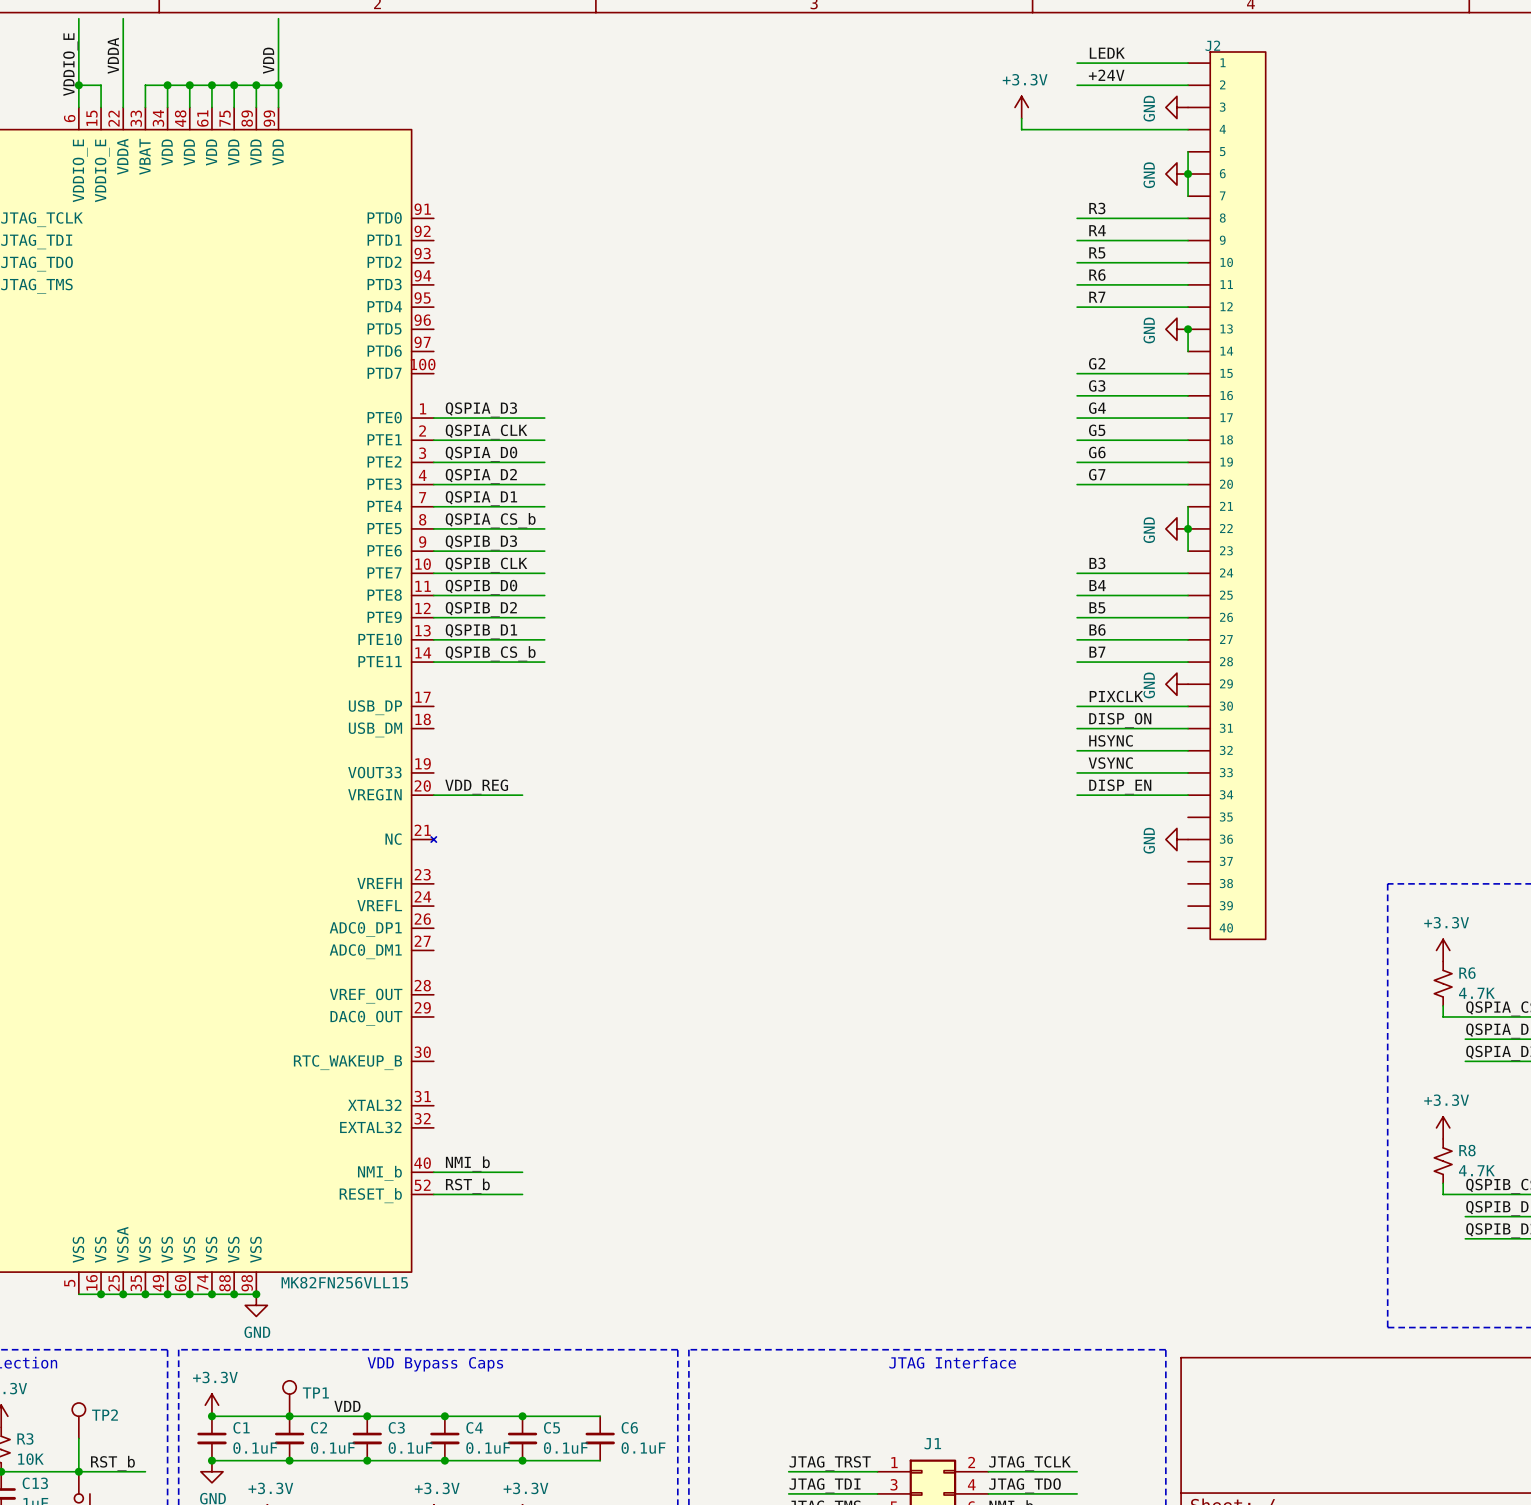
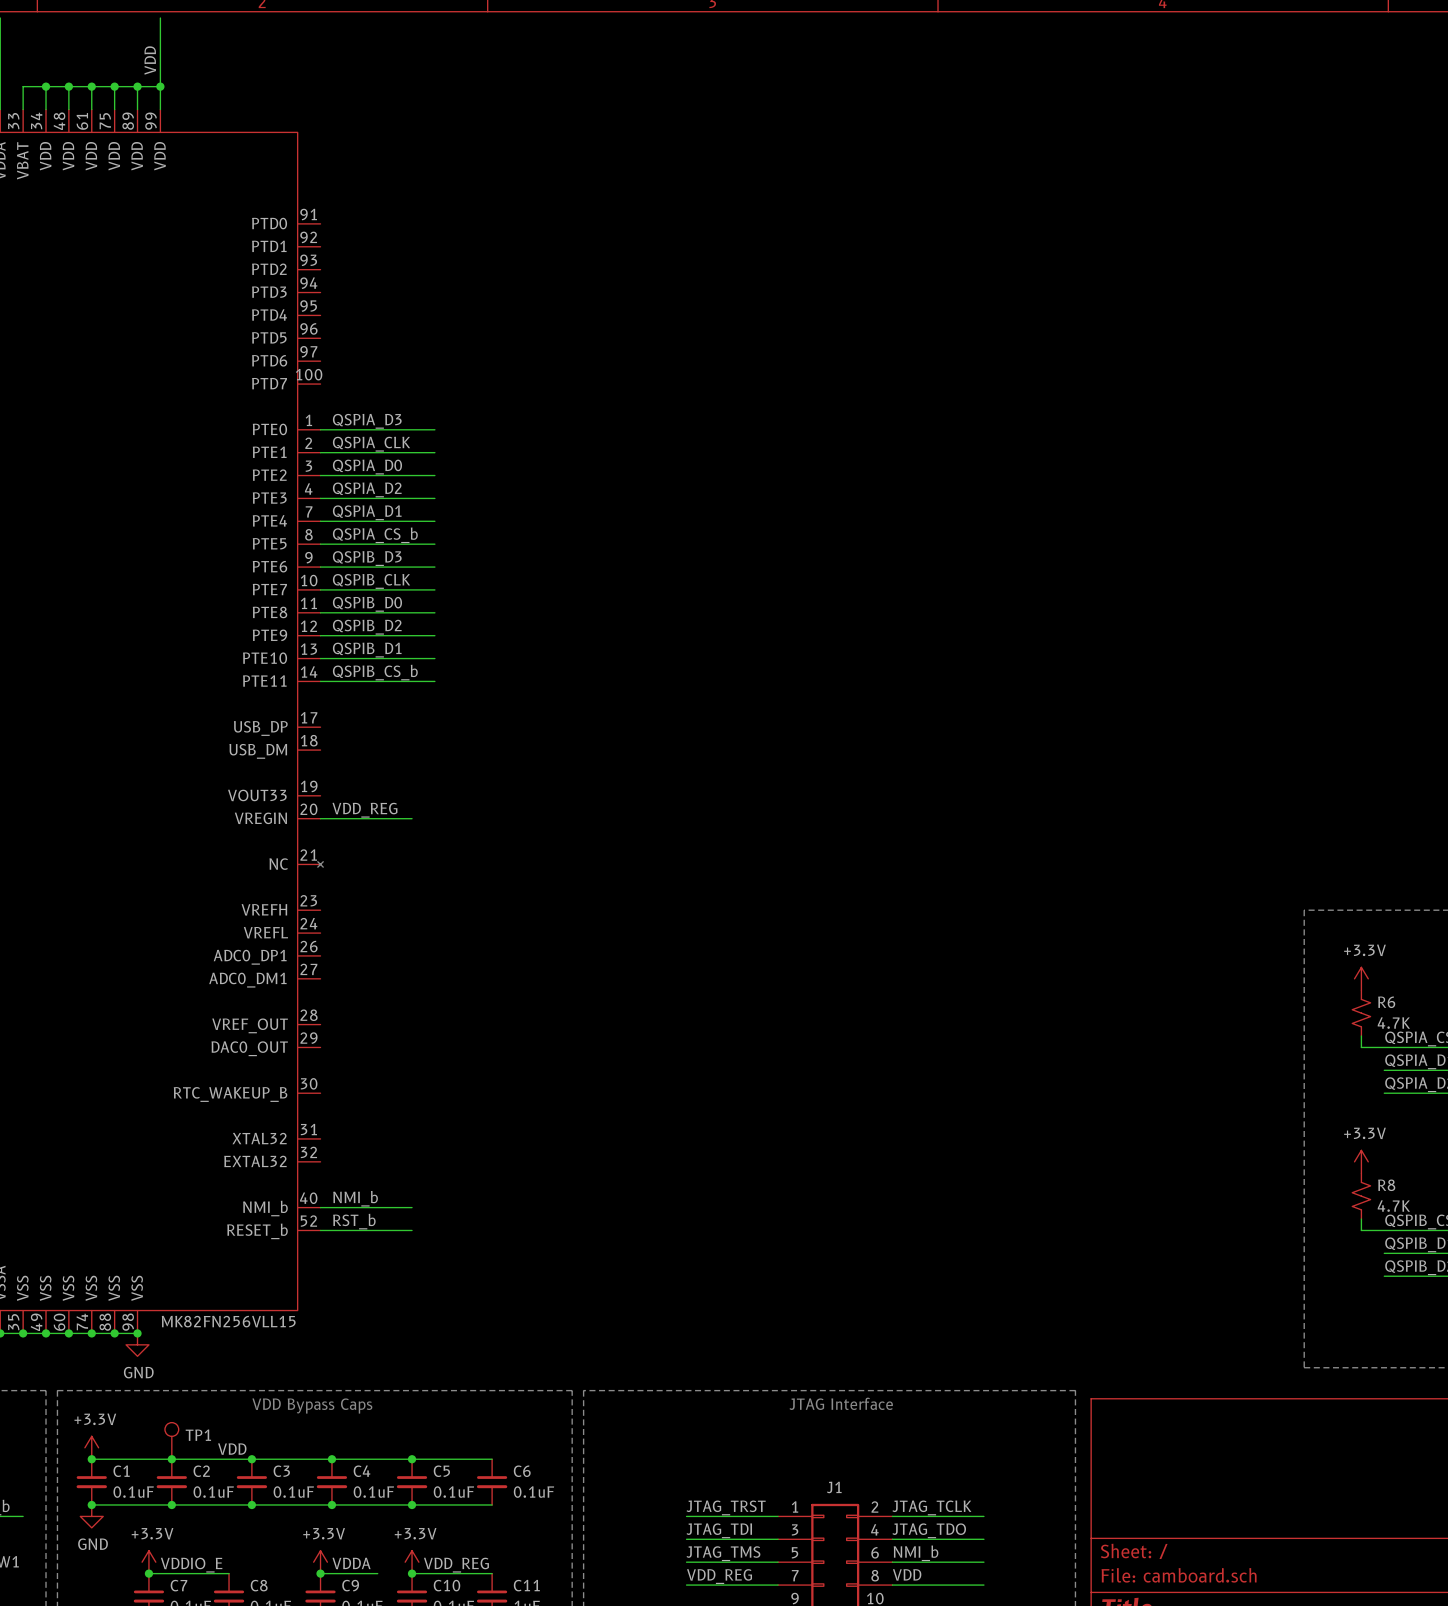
label: LEDK (1107, 53) -> none
wire: (1077, 63) (1188, 63) -> none
label: +24V (1106, 75) -> none
wire: (1077, 85) (1188, 85) -> none
power symbol: +3.3V (1021, 107) -> none
power symbol: GND (1176, 107) -> none
wire: (1021, 118) (1021, 129) (1188, 129) -> none
wire: (1188, 151) (1188, 196) -> none
power symbol: GND (1176, 174) -> none
junction: (1188, 174) -> none
label: R3 (1097, 208) -> none
wire: (1077, 218) (1188, 218) -> none
label: R4 (1097, 230) -> none
wire: (1077, 240) (1188, 240) -> none
label: R5 (1097, 252) -> none
wire: (1077, 262) (1188, 262) -> none
label: R6 (1097, 275) -> none
wire: (1077, 284) (1188, 284) -> none
label: R7 (1097, 297) -> none
wire: (1077, 307) (1188, 307) -> none
power symbol: GND (1176, 329) -> none
wire: (1188, 329) (1188, 351) -> none
junction: (1188, 329) -> none
label: G2 (1097, 363) -> none
wire: (1077, 373) (1188, 373) -> none
label: G3 (1097, 385) -> none
wire: (1077, 395) (1188, 395) -> none
label: G4 (1097, 408) -> none
wire: (1077, 418) (1188, 418) -> none
label: G5 (1097, 430) -> none
wire: (1077, 440) (1188, 440) -> none
label: G6 (1097, 452) -> none
wire: (1077, 462) (1188, 462) -> none
label: G7 (1097, 474) -> none
wire: (1077, 484) (1188, 484) -> none
J2: (1226, 495) -> none
wire: (1188, 506) (1188, 551) -> none
power symbol: GND (1176, 528) -> none
junction: (1188, 528) -> none
label: B3 (1097, 563) -> none
wire: (1077, 573) (1188, 573) -> none
label: B4 (1097, 585) -> none
wire: (1077, 595) (1188, 595) -> none
label: B5 (1097, 607) -> none
wire: (1077, 617) (1188, 617) -> none
label: B6 (1097, 629) -> none
wire: (1077, 639) (1188, 639) -> none
label: B7 (1097, 652) -> none
wire: (1077, 662) (1188, 662) -> none
power symbol: GND (1176, 684) -> none
label: PIXCLK (1116, 696) -> none
wire: (1077, 706) (1188, 706) -> none
label: DISP_ON (1120, 720) -> none
wire: (1077, 728) (1188, 728) -> none
label: HSYNC (1111, 740) -> none
wire: (1077, 750) (1188, 750) -> none
label: VSYNC (1110, 763) -> none
wire: (1077, 772) (1188, 772) -> none
label: DISP_EN (1120, 786) -> none
wire: (1077, 795) (1188, 795) -> none
power symbol: GND (1176, 839) -> none

